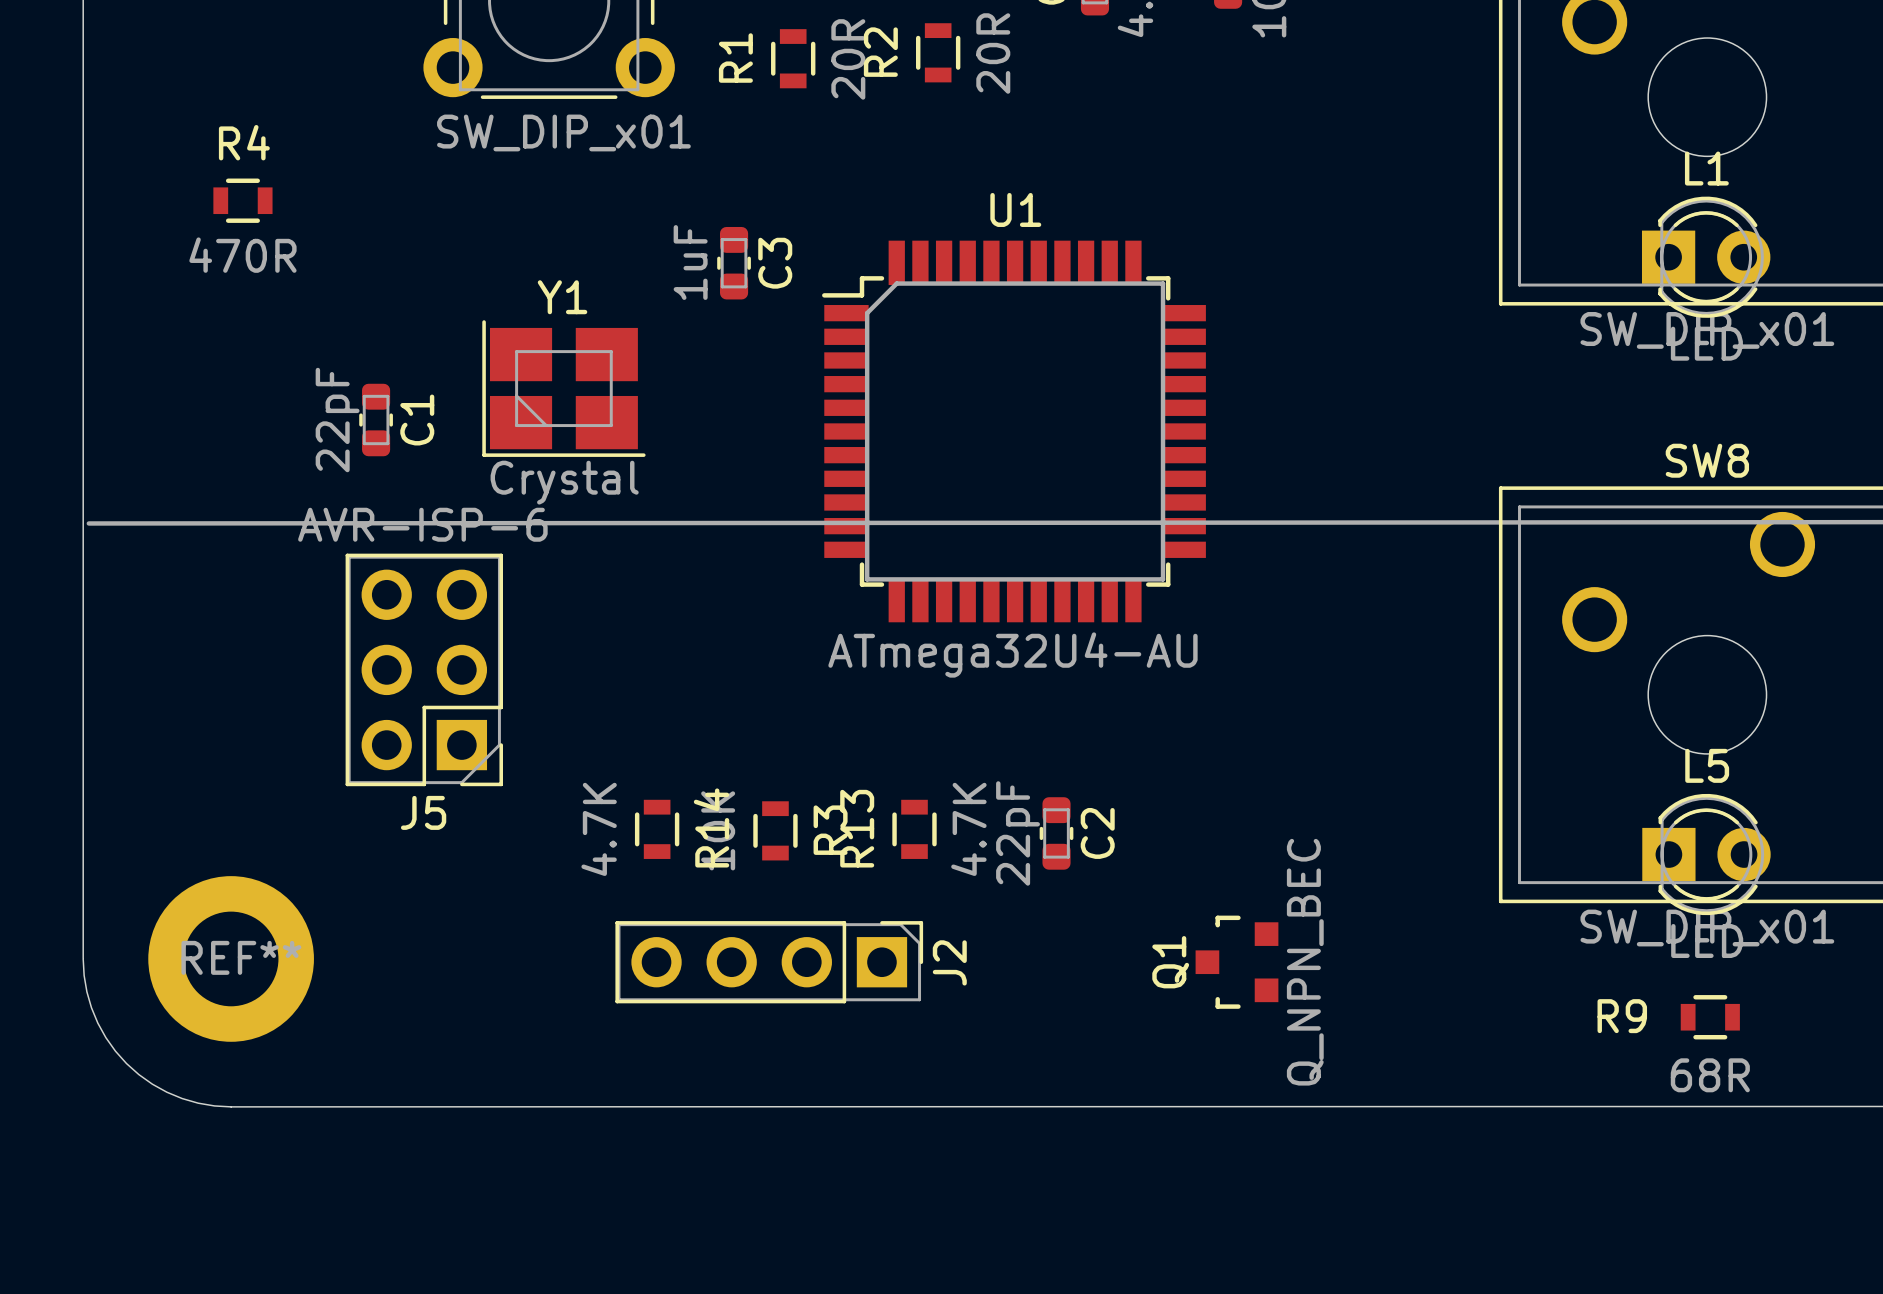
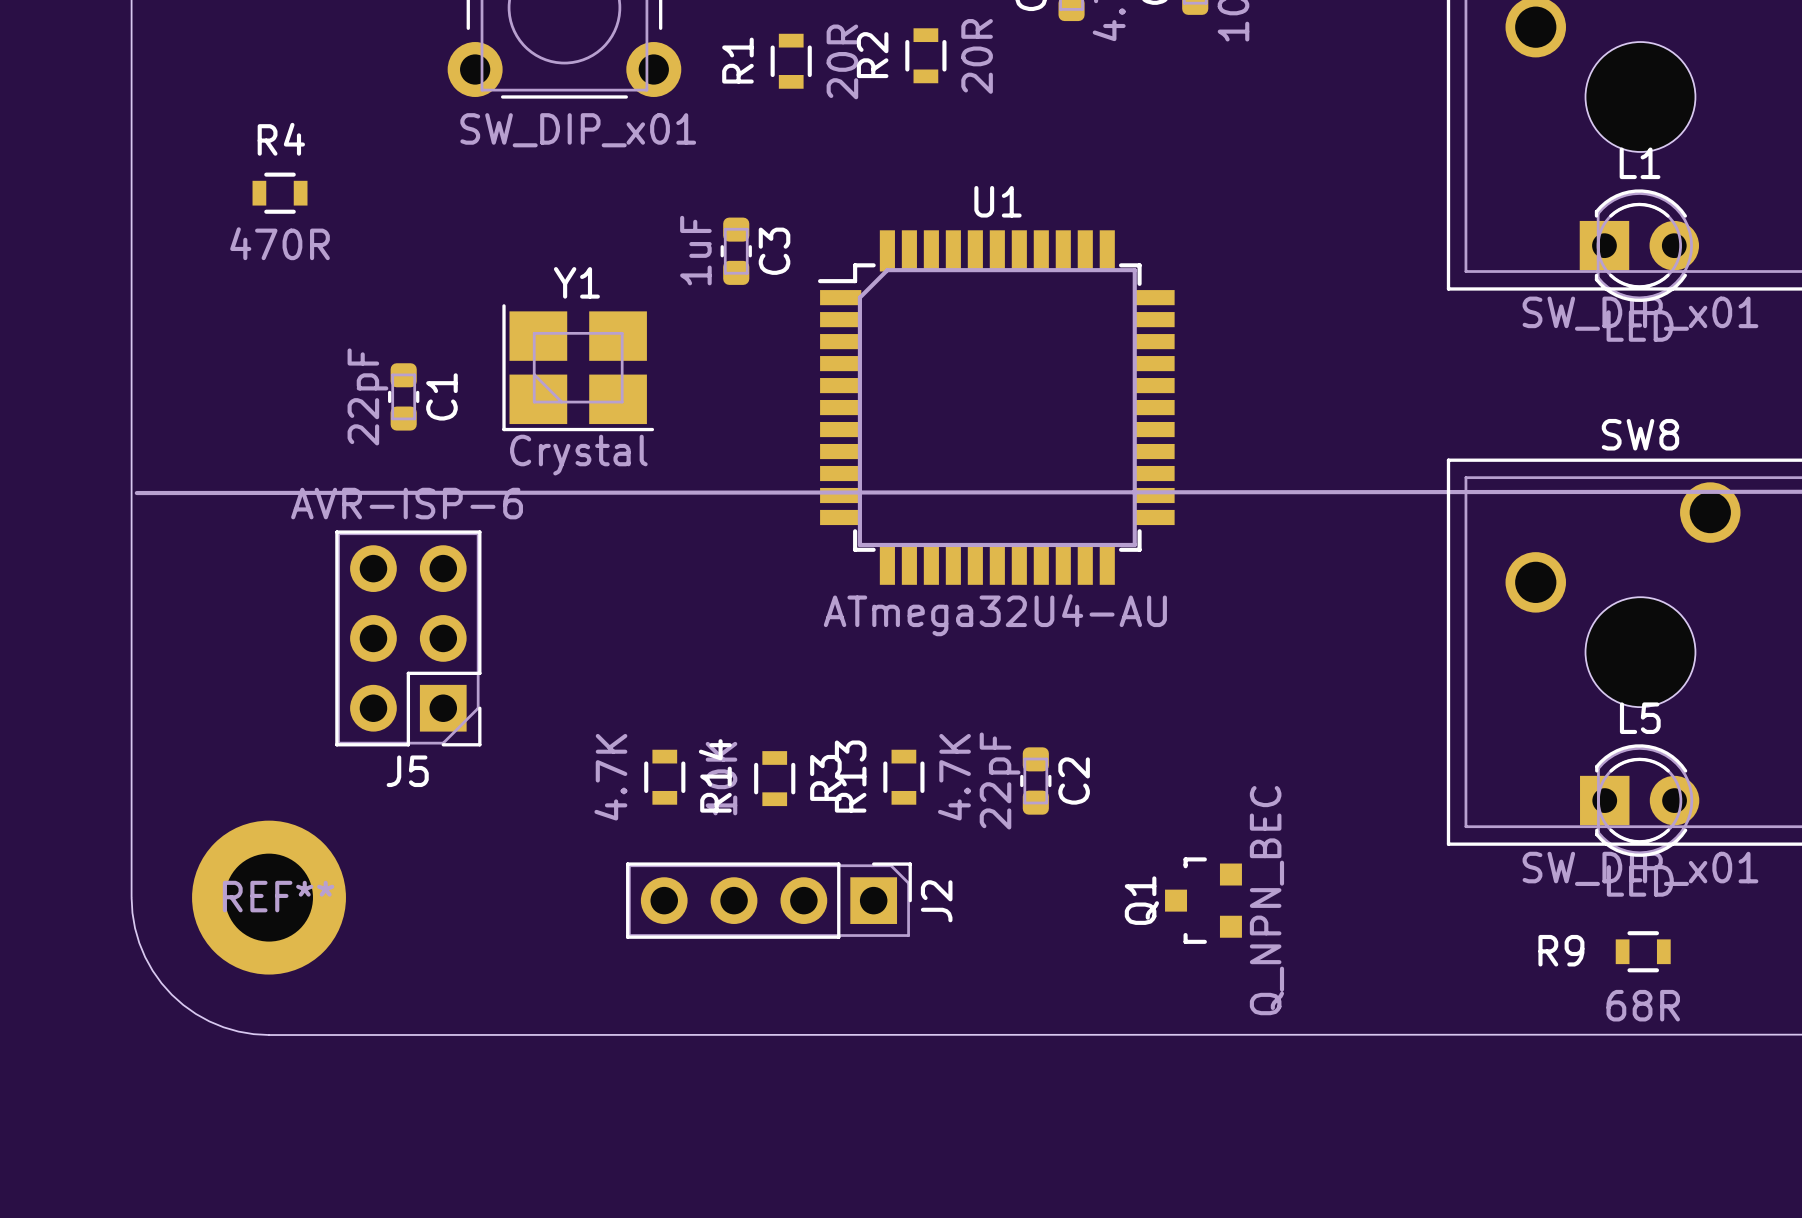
J5 position: (424, 669) -> (408, 638)

